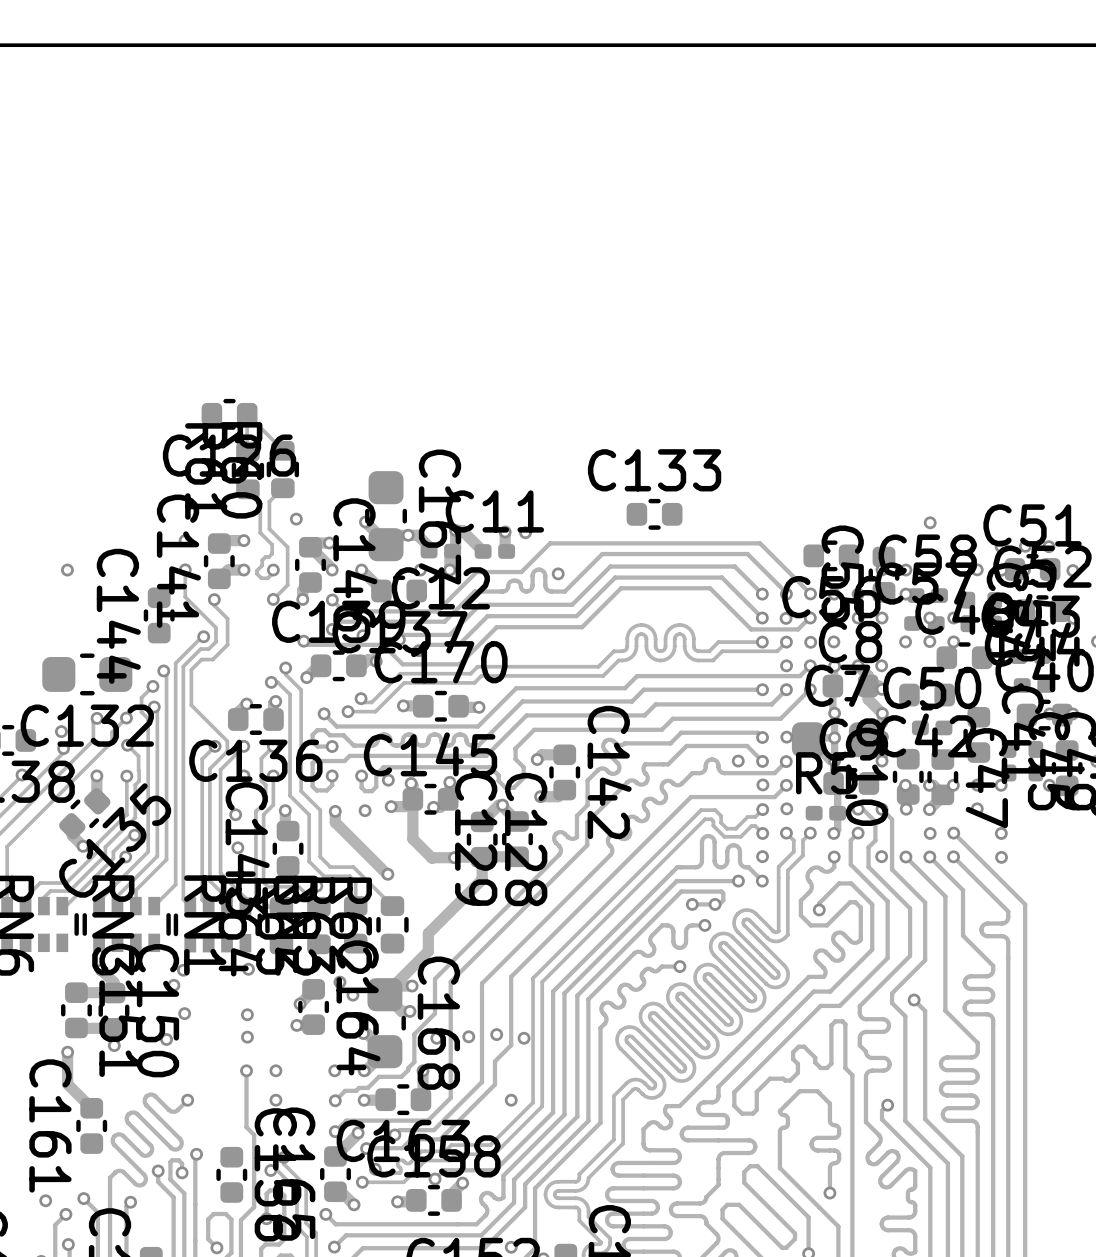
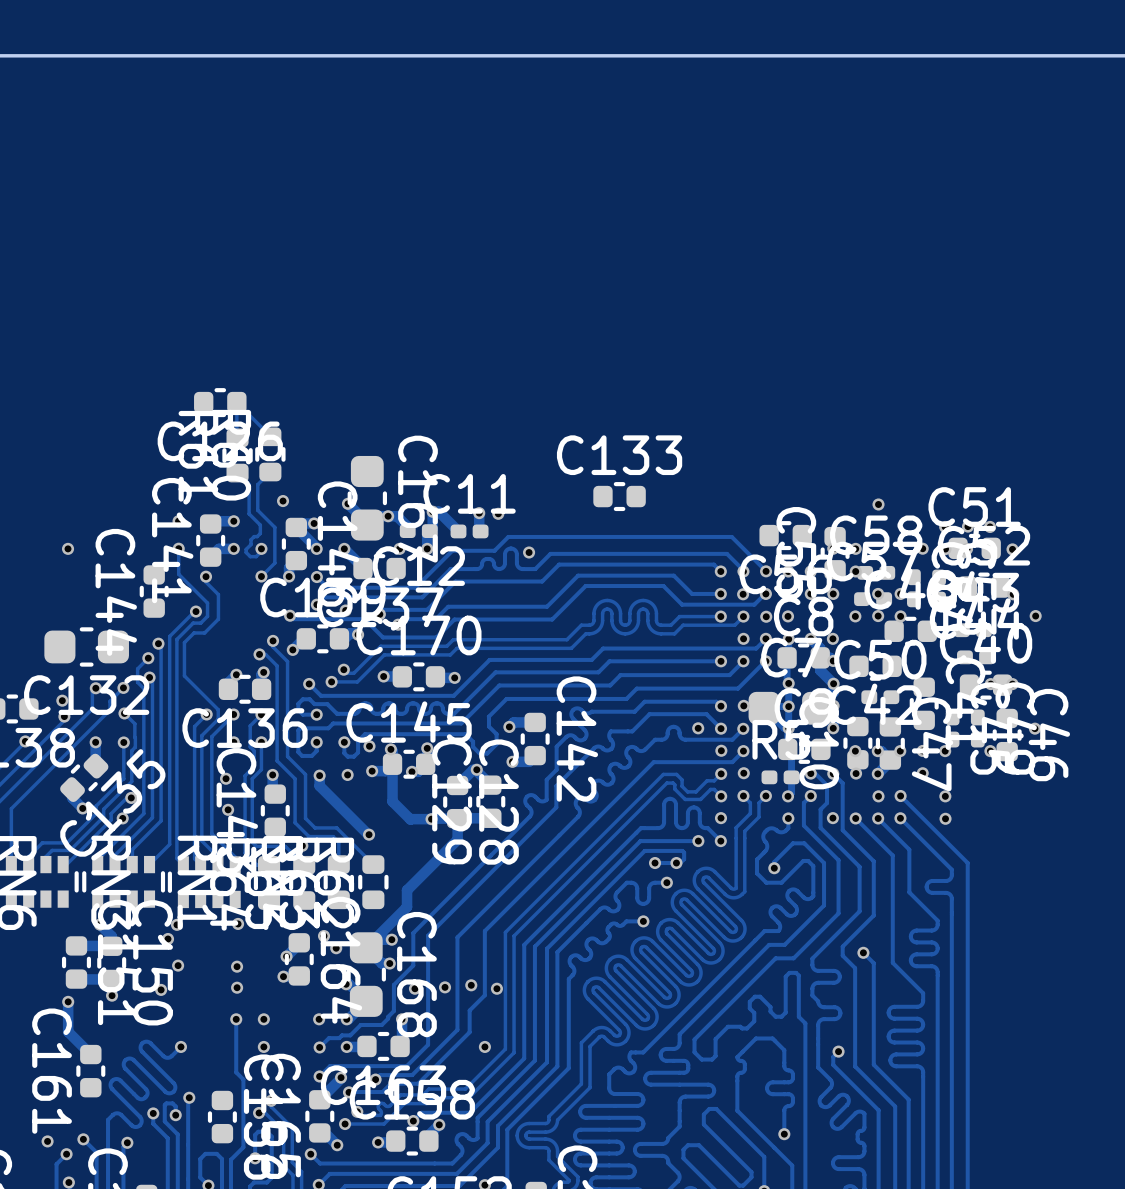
track: (774, 557) (760, 543) (550, 543) (536, 557) -> (731, 536) (508, 536)
track: (768, 575) (747, 554) (602, 554) (581, 575) -> (726, 553) (550, 553)
track: (755, 586) (734, 566) (610, 566) (590, 586) -> (713, 564) (559, 564)
track: (762, 618) (721, 577) (615, 577) (576, 616) (487, 616) (472, 631) -> (720, 593) (692, 593) (673, 575) (578, 575) (547, 606) (448, 606)
track: (751, 629) (710, 588) (621, 588) (582, 627) (496, 627) (478, 645) -> (710, 604) (682, 604) (663, 586) (585, 586) (552, 619) (454, 619)

